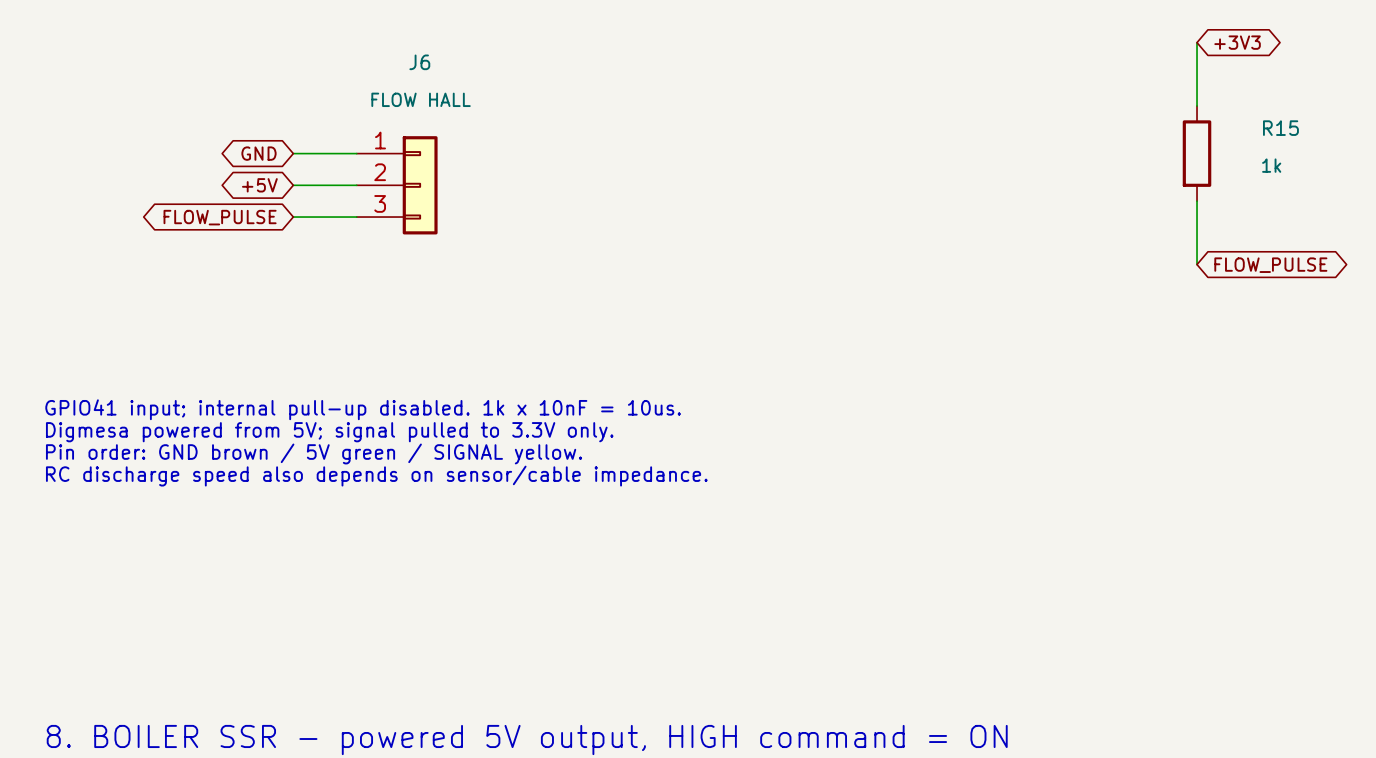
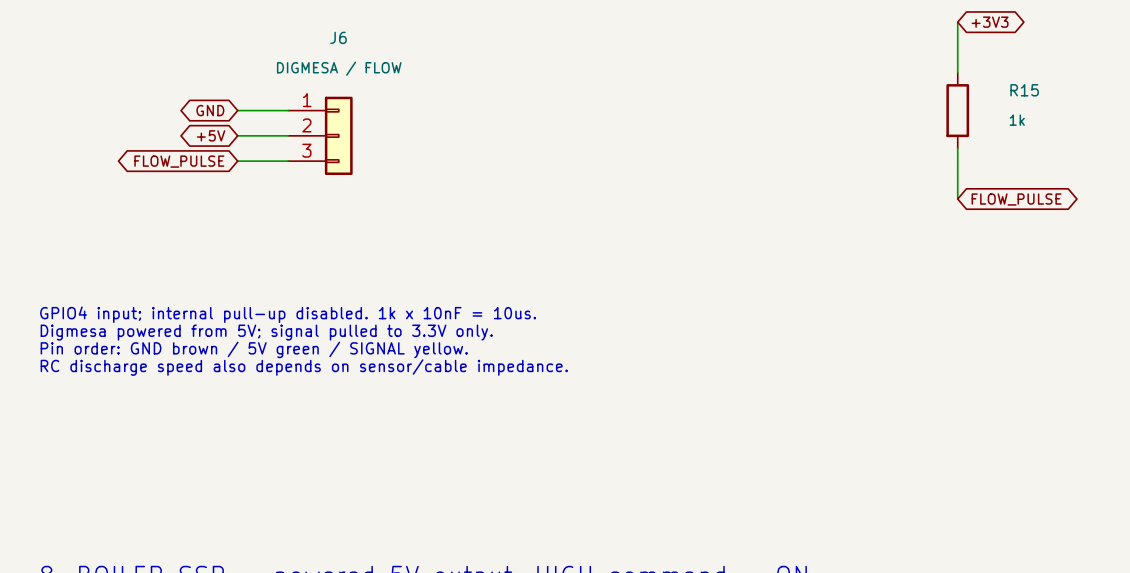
J6 value: FLOW HALL (421, 99) -> DIGMESA / FLOW (339, 68)
text: GPIO41 input; internal pull-up disabled. 1k x 10nF = 10us. (363, 409) -> GPIO4 input; internal pull-up disabled. 1k x 10nF = 10us. (288, 314)

